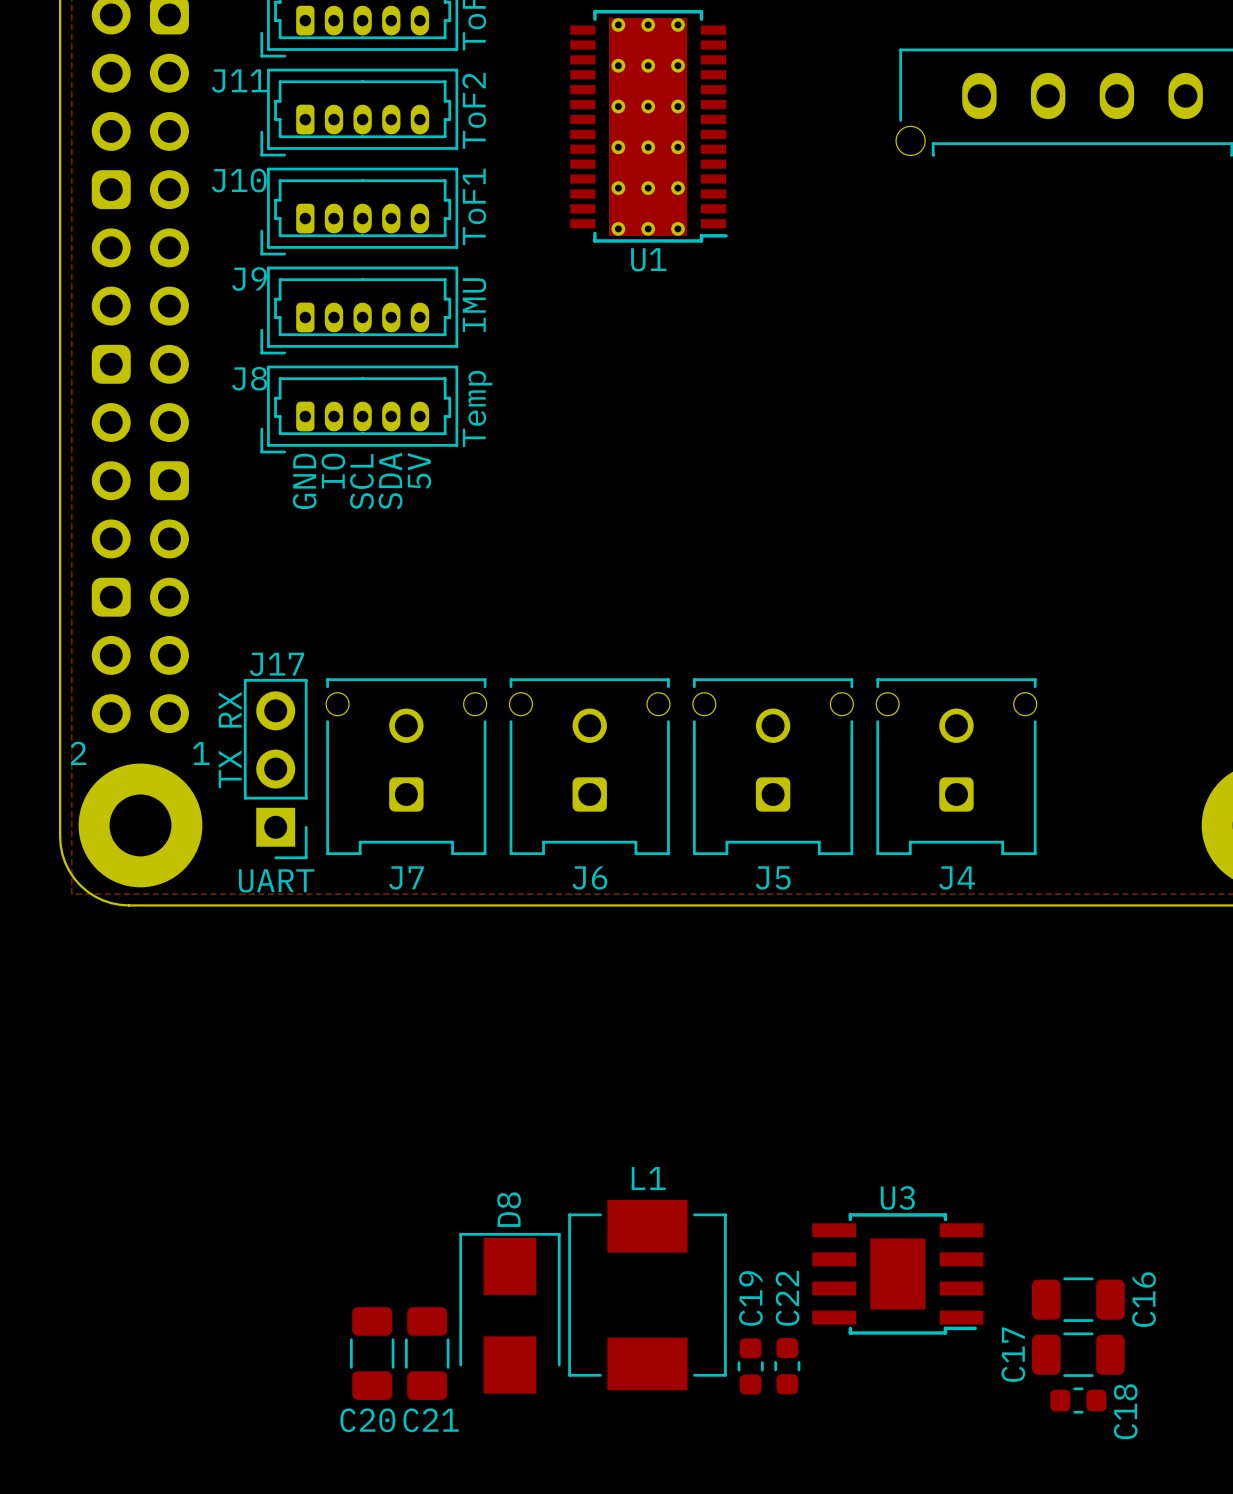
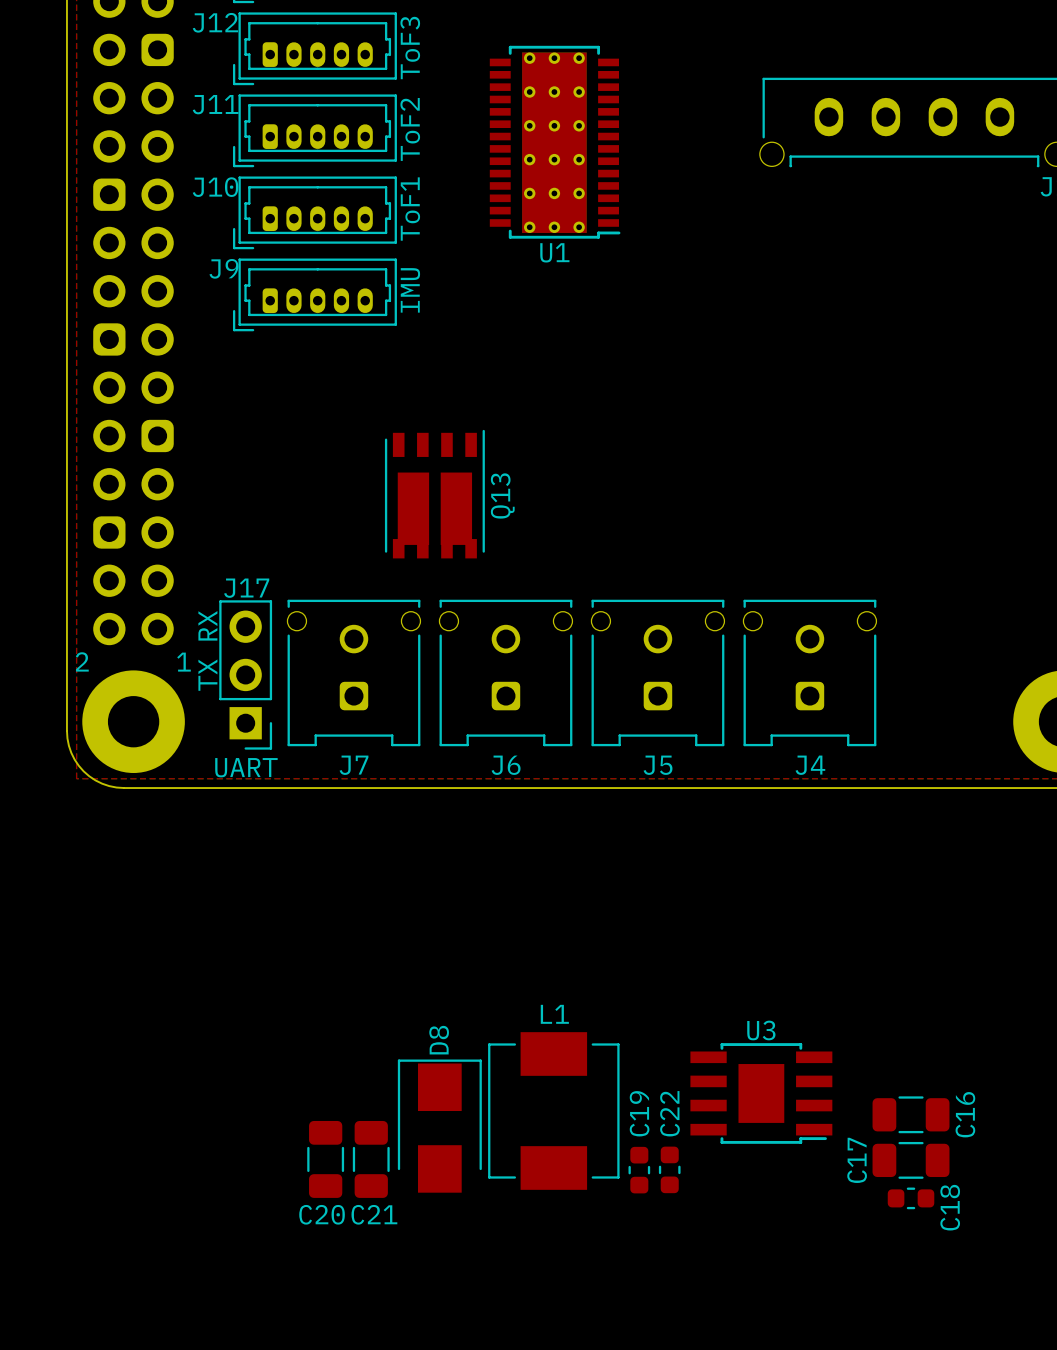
J8: Temp (359, 409) -> none
Q13: none -> (434, 494)

